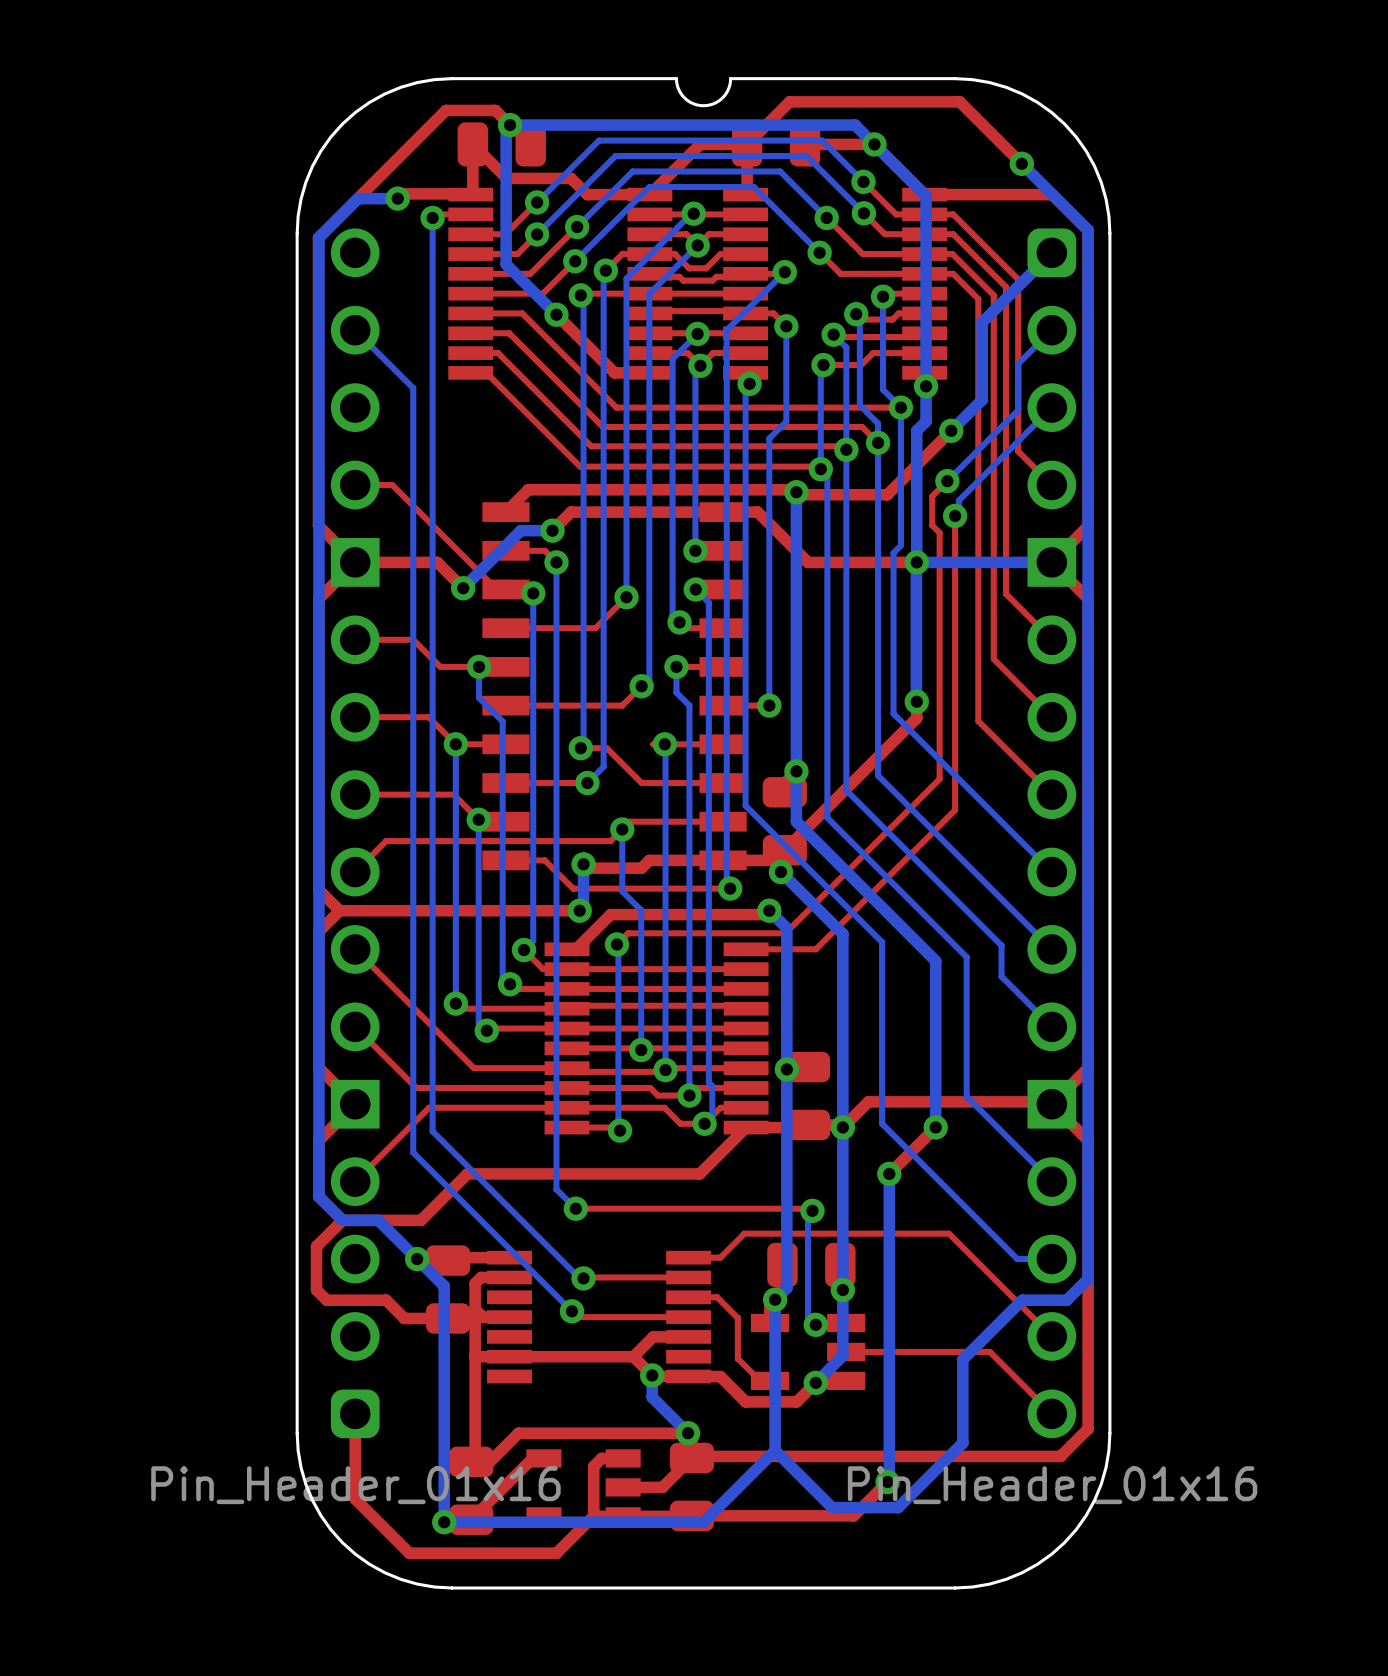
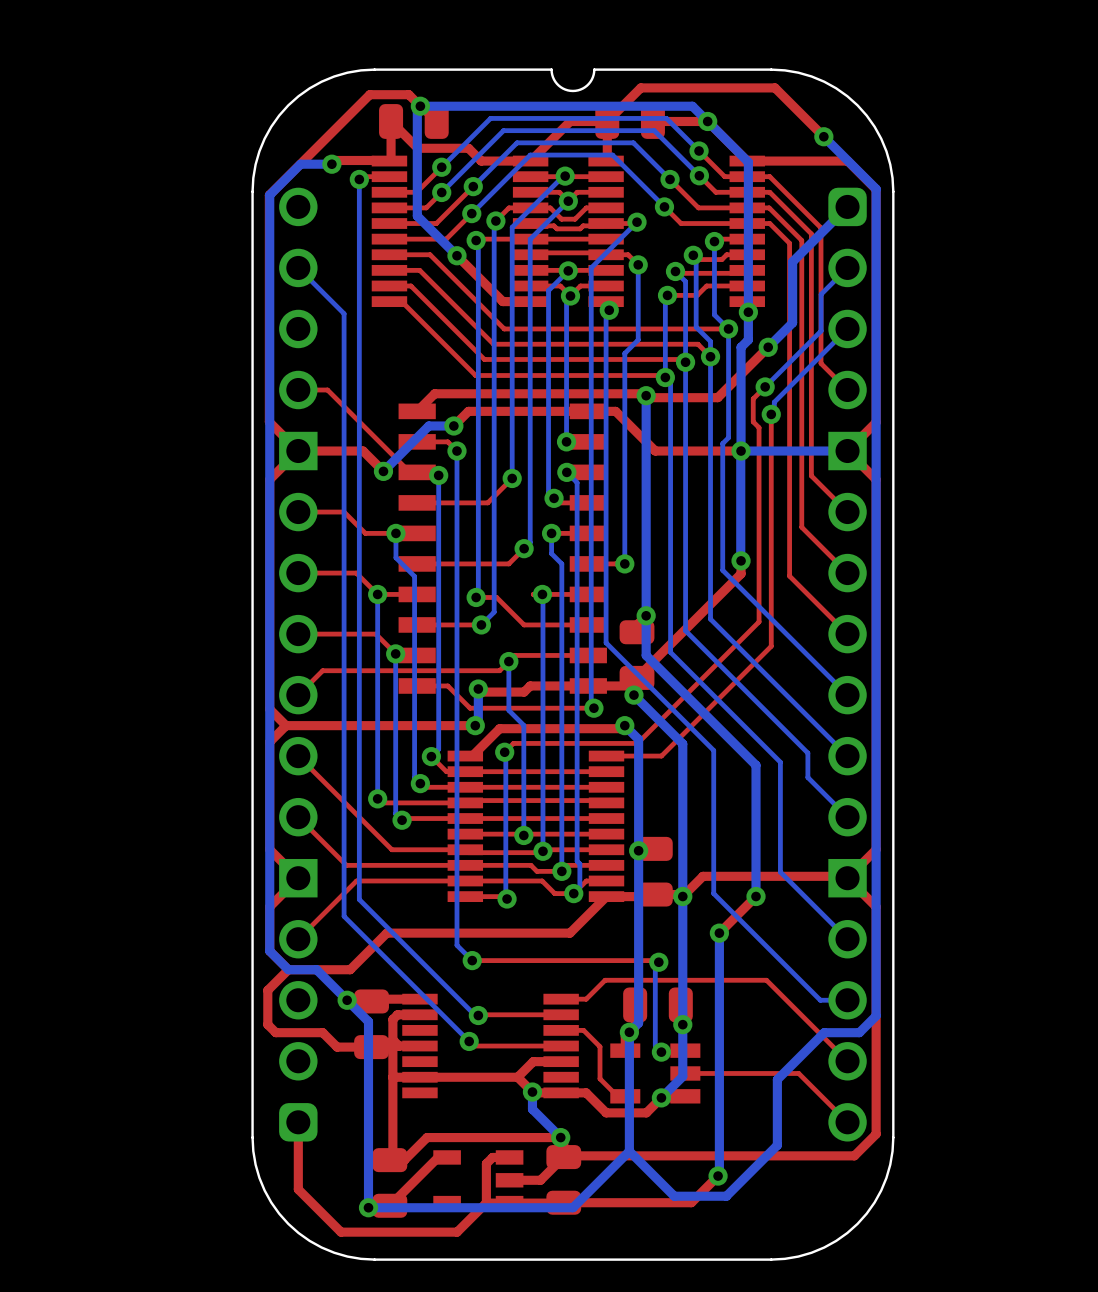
drawing: [151, 1466, 561, 1505] -> none
drawing: [847, 1466, 1258, 1505] -> none

